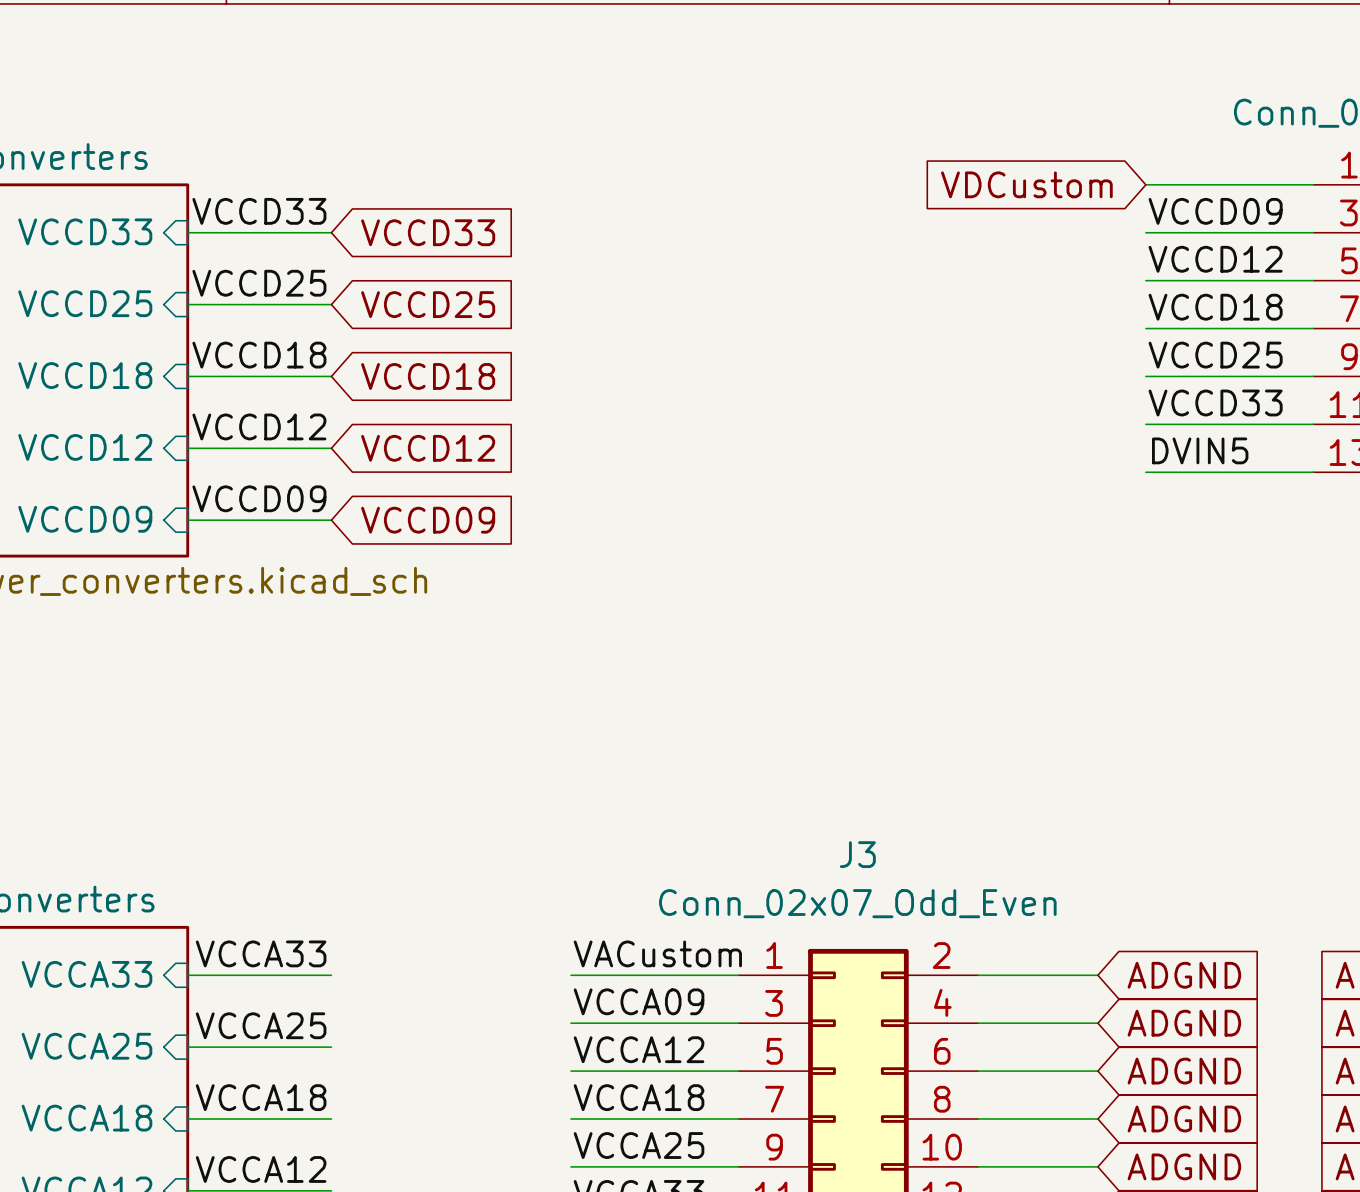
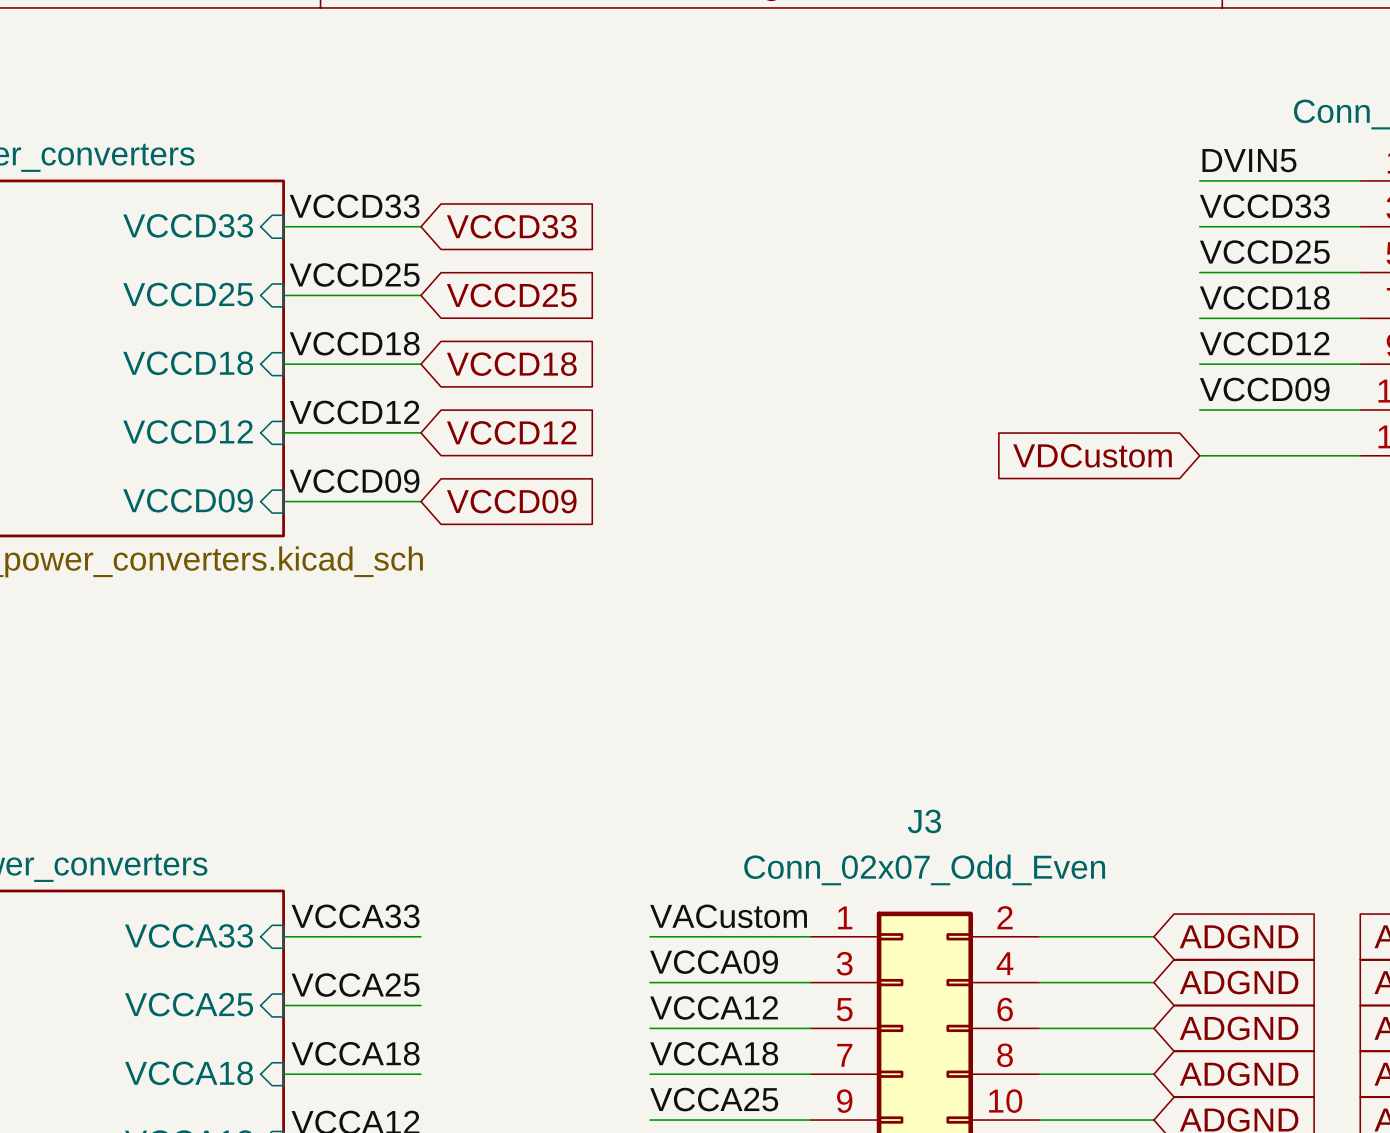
global label position: VDCustom (1026, 184) -> VDCustom (1092, 455)
label: VCCD09 (1215, 211) -> VCCD33 (1264, 206)
label: VCCD12 (1215, 259) -> VCCD25 (1264, 252)
label: VCCD25 (1215, 355) -> VCCD12 (1264, 343)
label: VCCD33 (1215, 402) -> VCCD09 (1264, 389)
label position: DVIN5 (1200, 450) -> DVIN5 (1249, 160)

